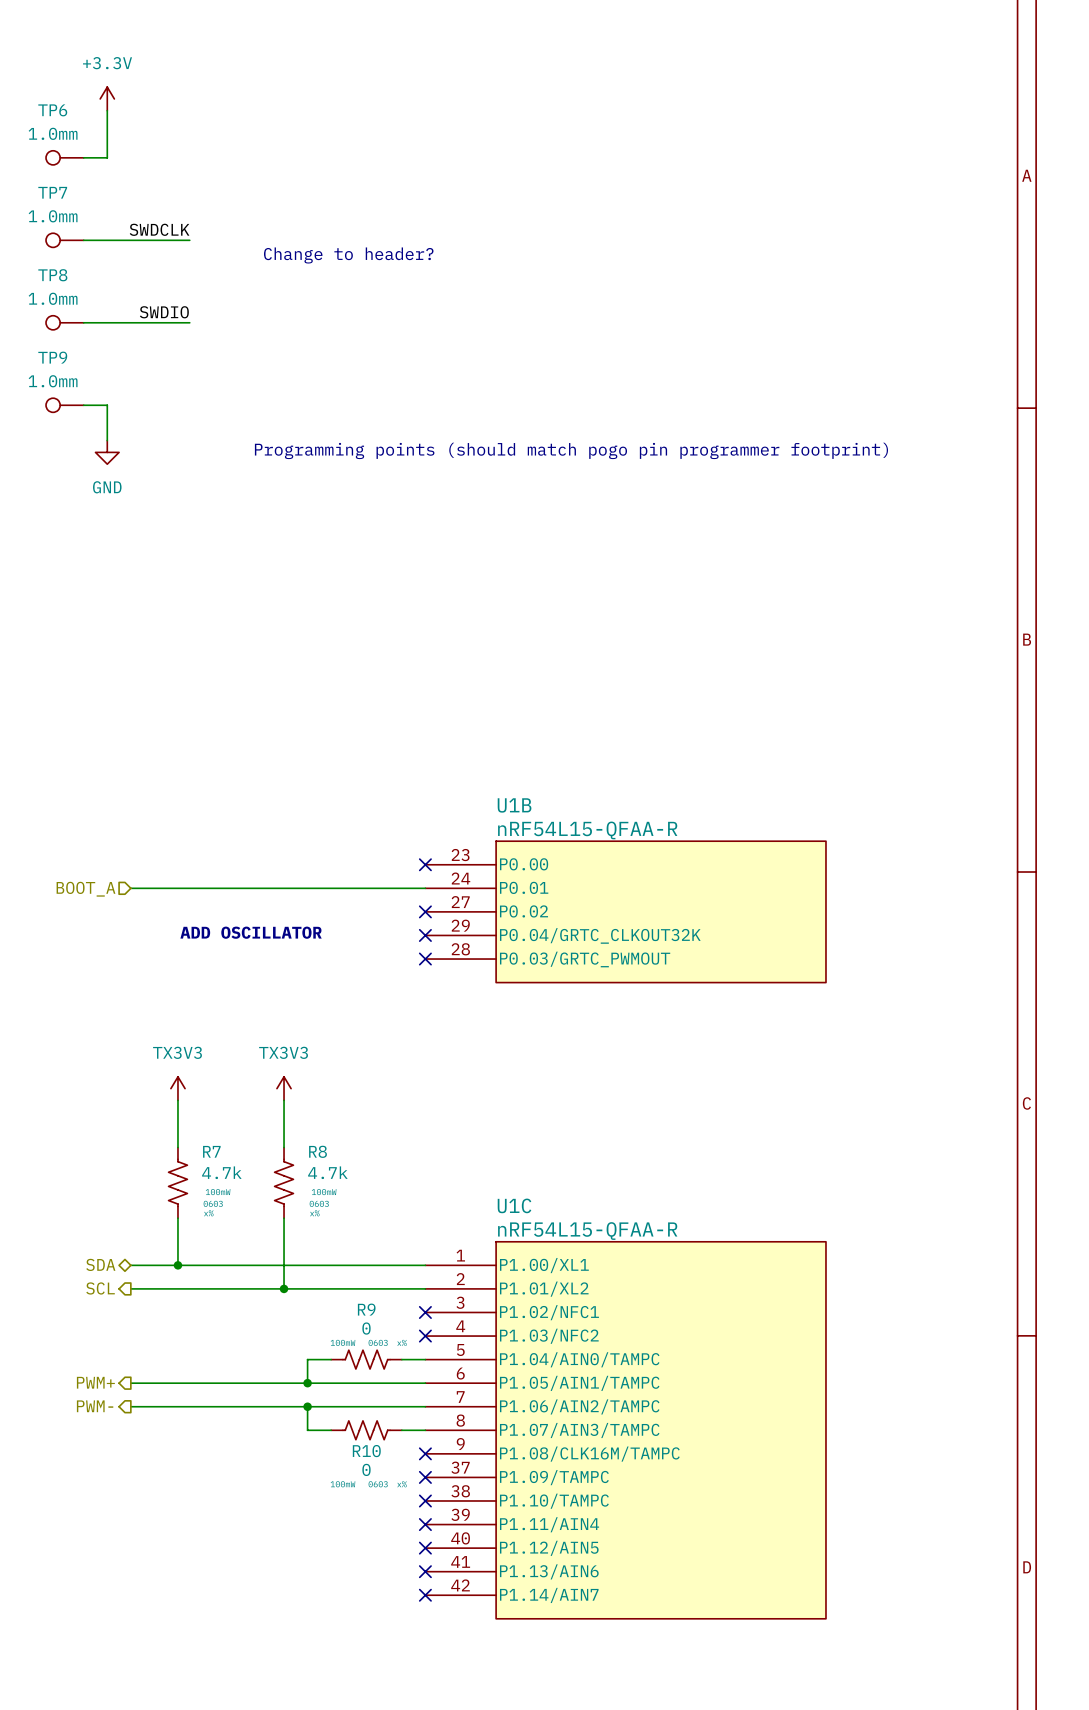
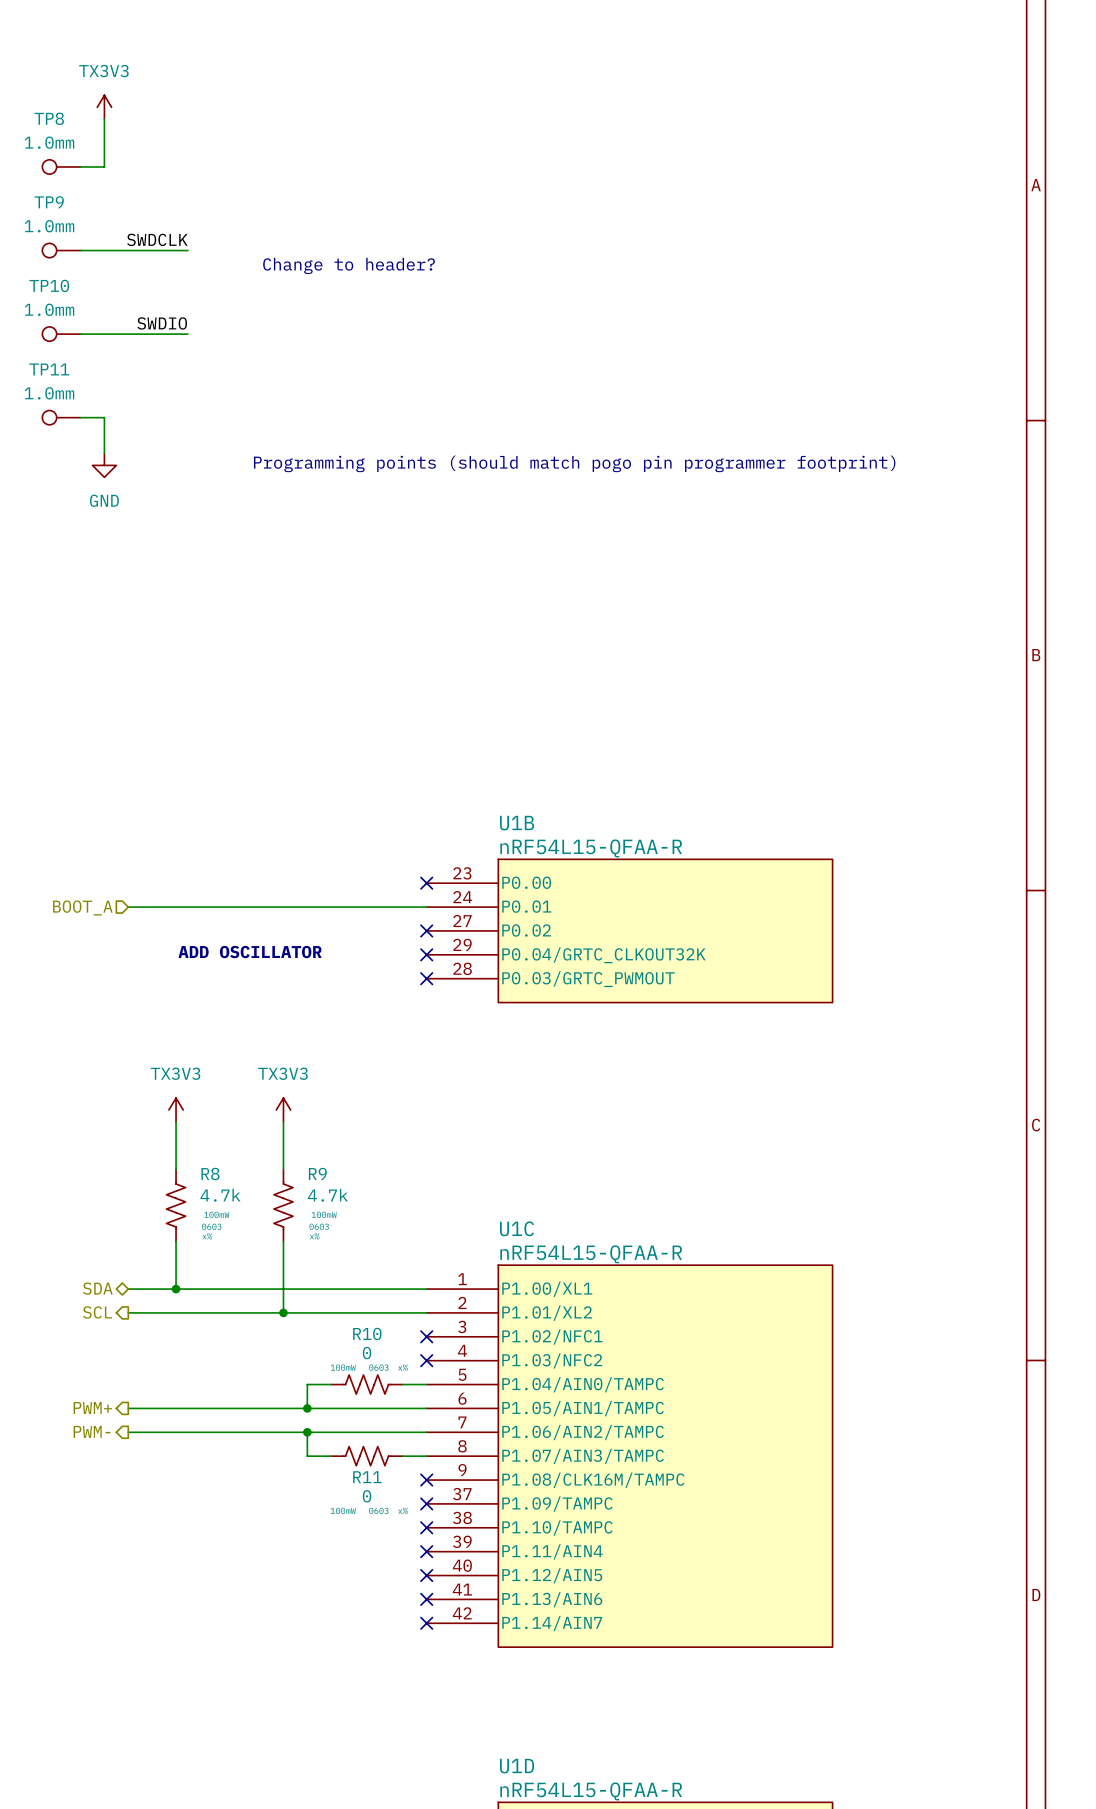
power symbol: +3.3V (107, 98) -> TX3V3 (104, 107)
TP6 name: TP6 (52, 110) -> TP8 (49, 118)
TP7 name: TP7 (52, 192) -> TP9 (49, 202)
TP8 name: TP8 (52, 275) -> TP10 (49, 285)
TP9 name: TP9 (52, 357) -> TP11 (49, 369)
R7 name: R7 (211, 1151) -> R8 (210, 1174)
R8 name: R8 (318, 1151) -> R9 (317, 1173)
R9 name: R9 (366, 1309) -> R10 (367, 1333)
R10 name: R10 (366, 1451) -> R11 (367, 1477)

